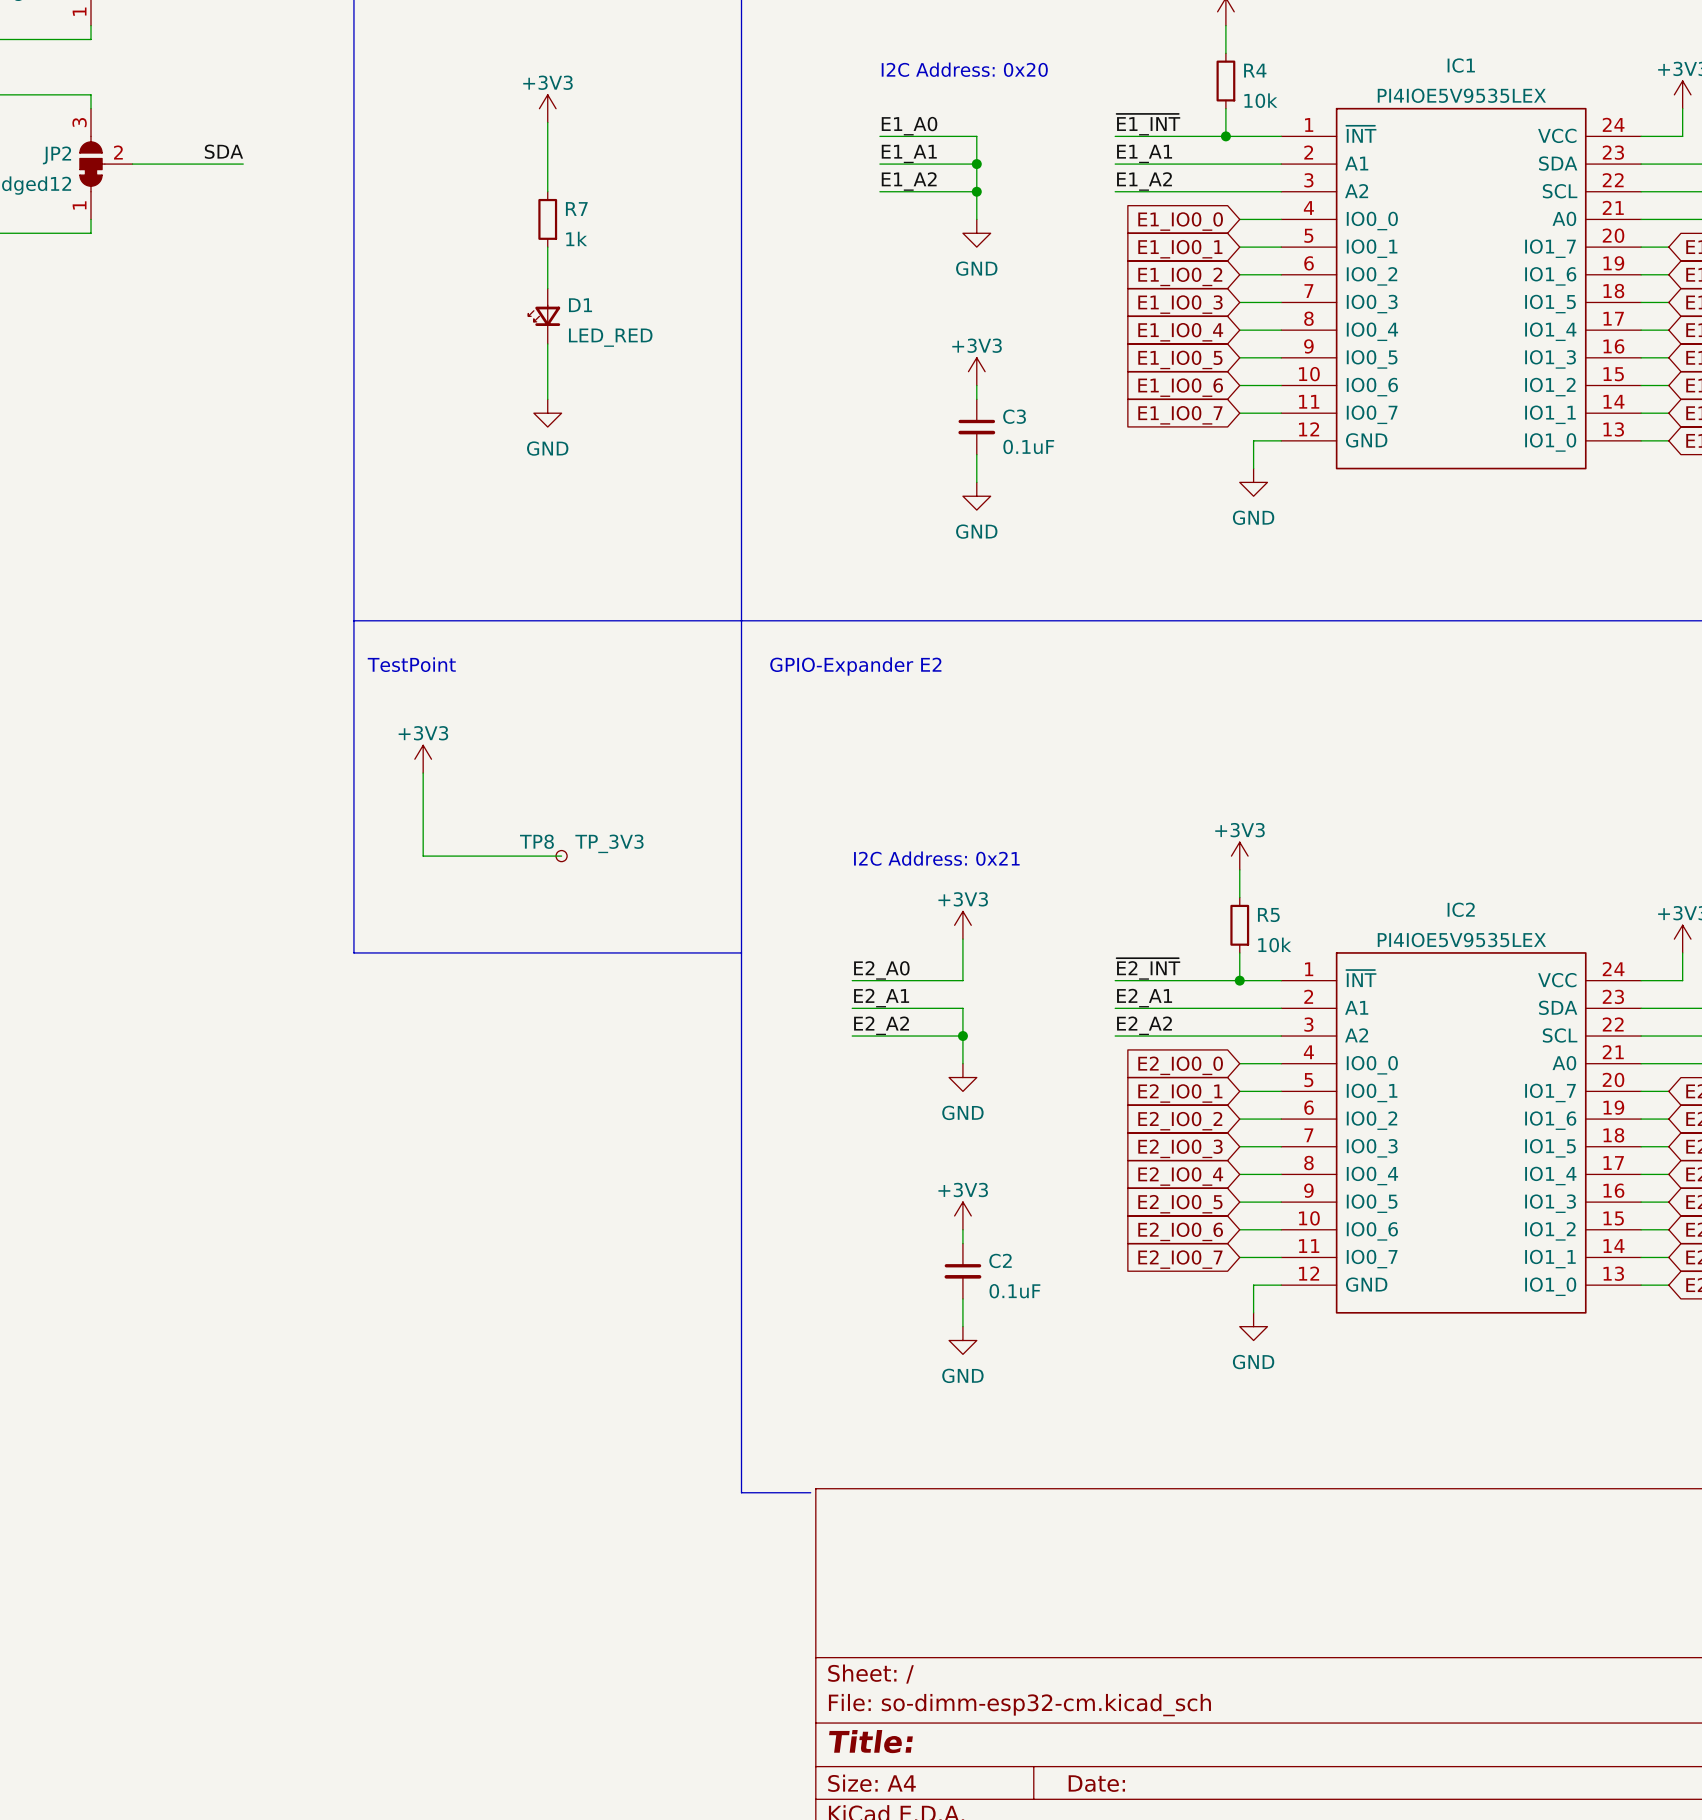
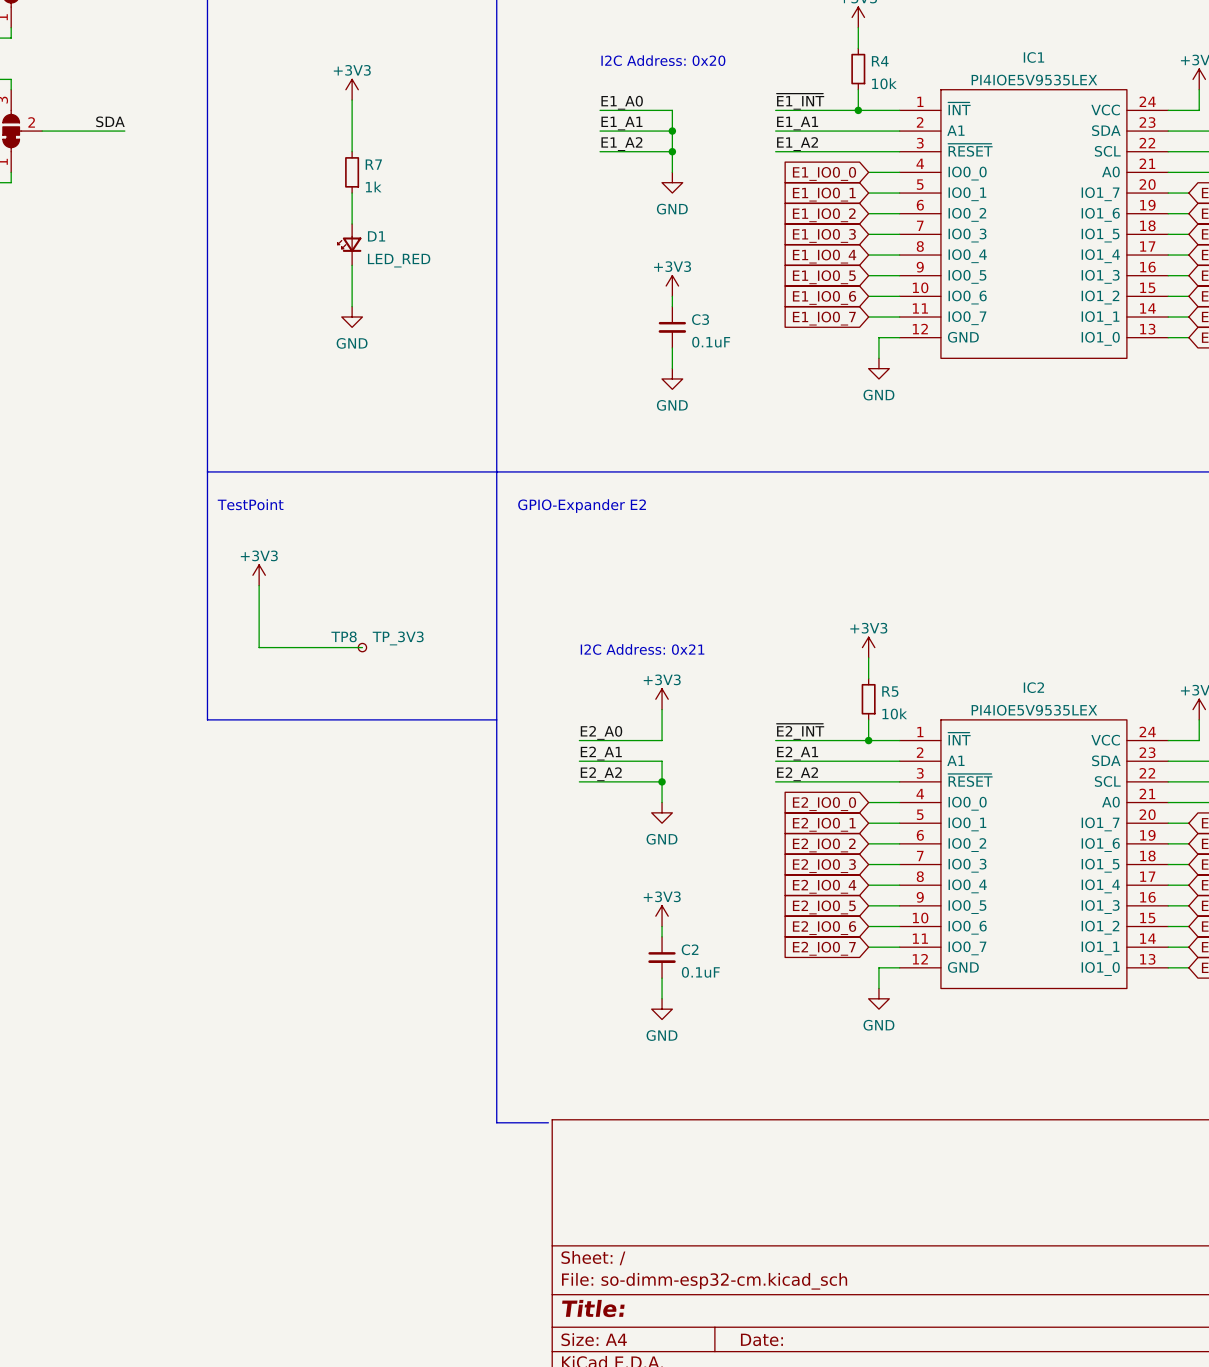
IC1 pin name: A2 (1356, 191) -> ~{RESET} (970, 150)
IC2 pin name: A2 (1356, 1035) -> ~{RESET} (970, 780)

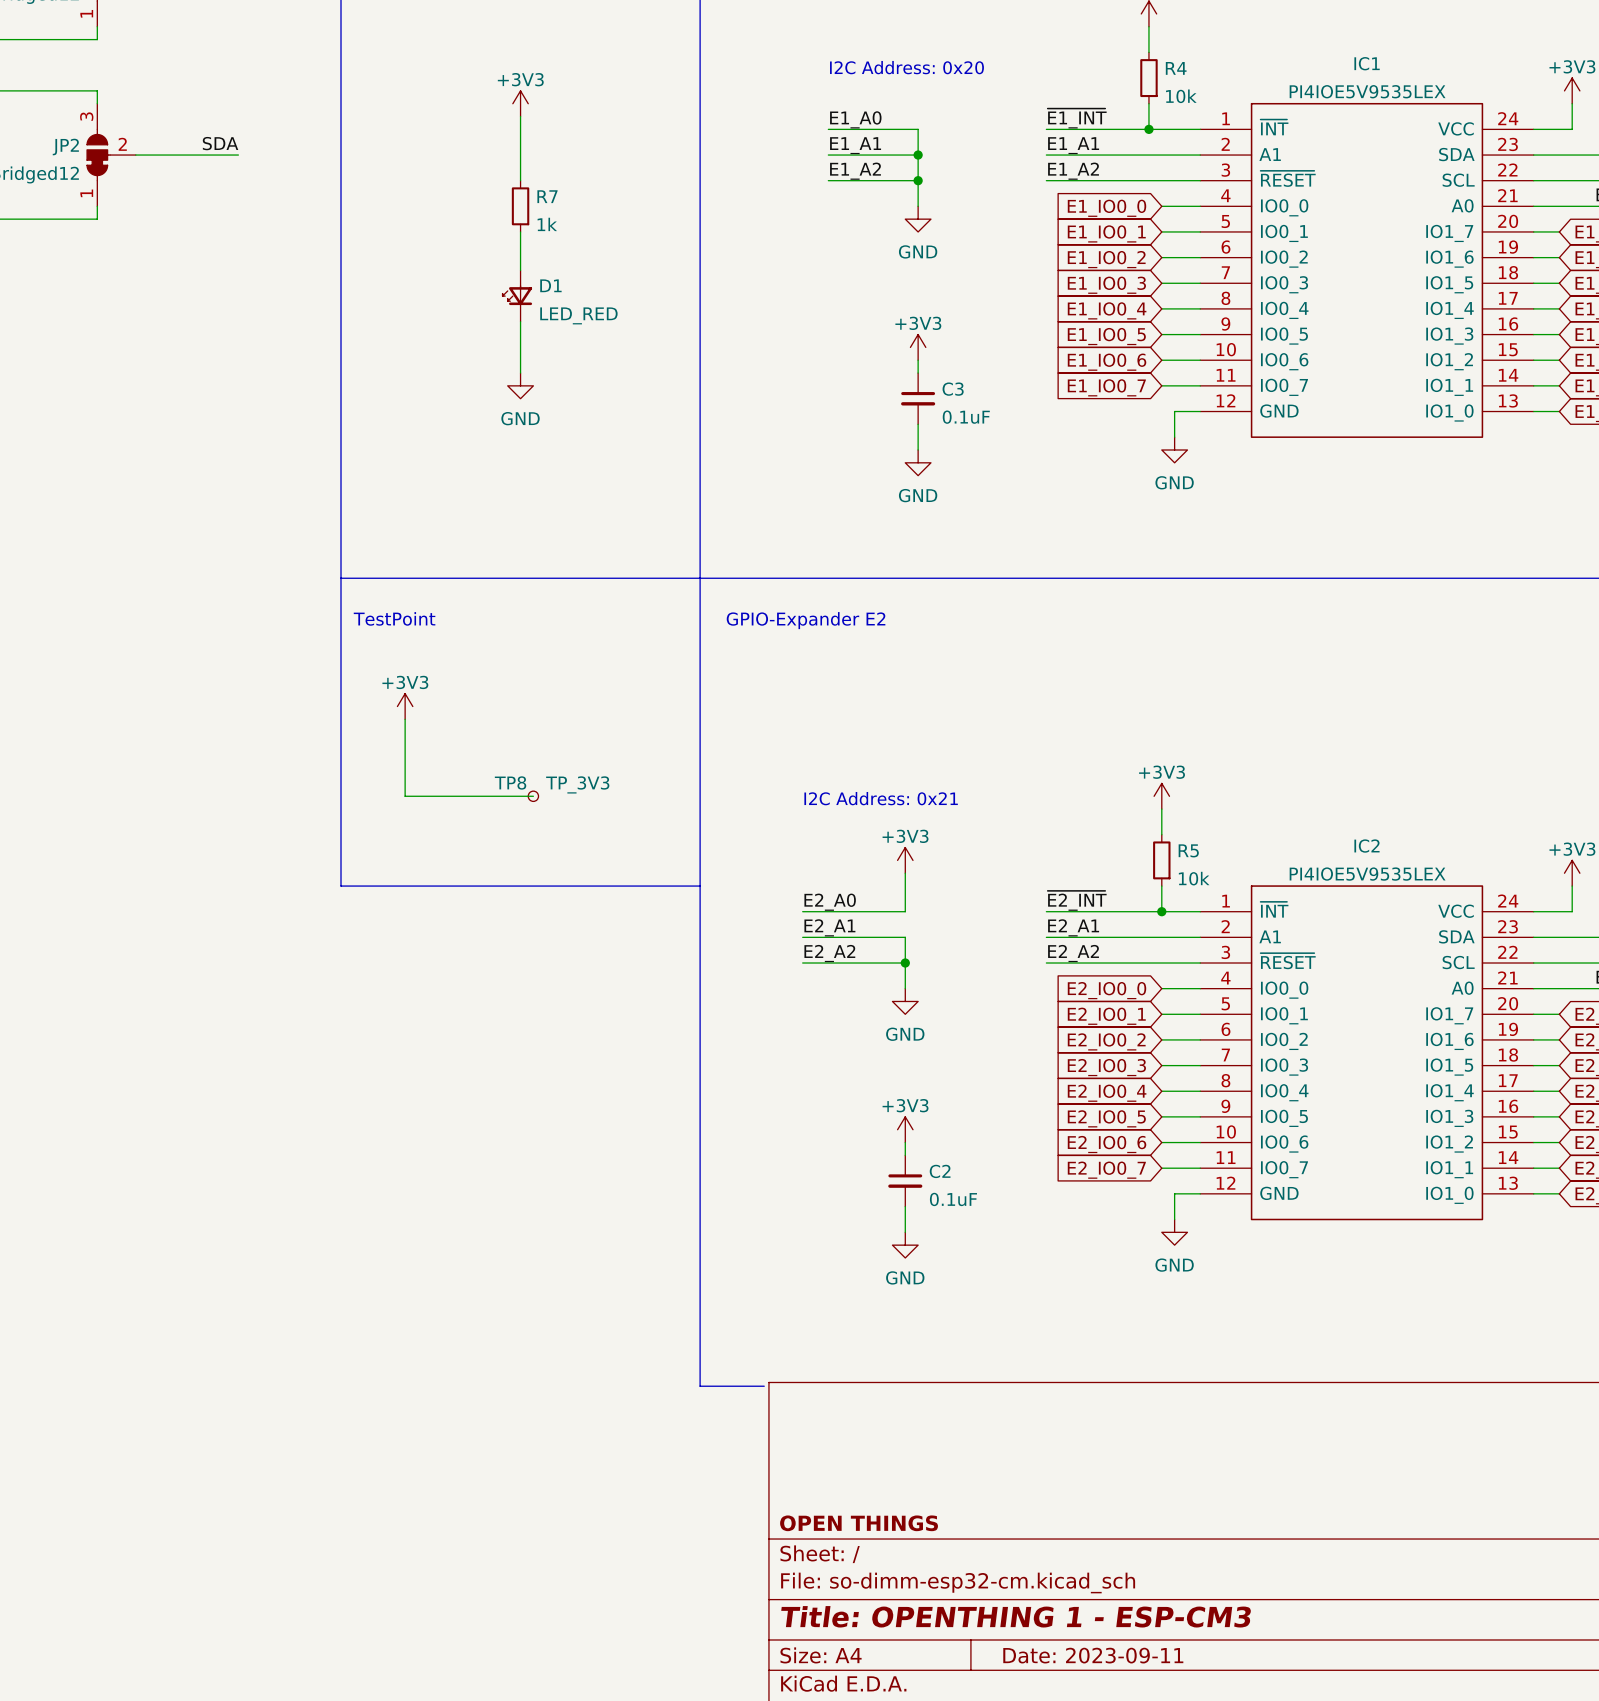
title block: none -> OPEN THINGS (859, 1523)
title block: Title: (593, 1308) -> Title: OPENTHING 1 - ESP-CM3 (1016, 1616)
title block: Date: (761, 1339) -> Date: 2023-09-11 (1093, 1655)

